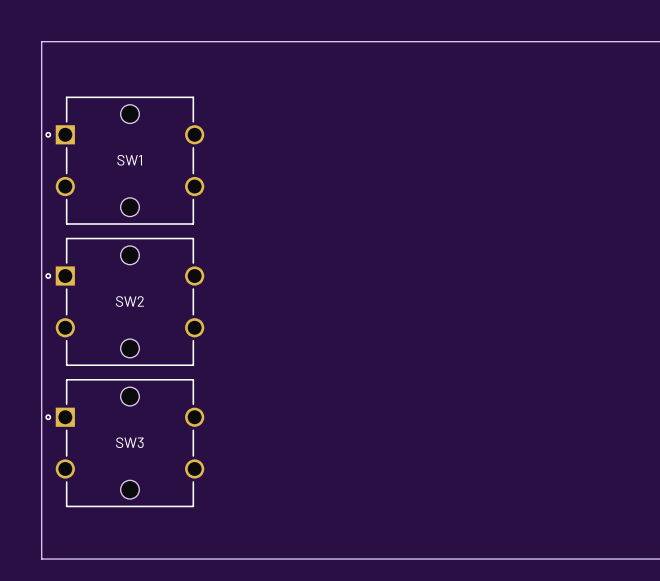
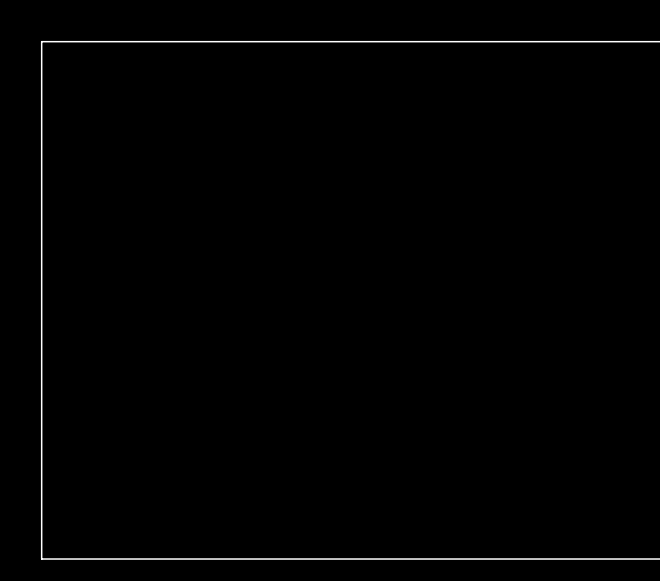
SW1: (124, 160) -> none
SW2: (124, 301) -> none
SW3: (124, 443) -> none

